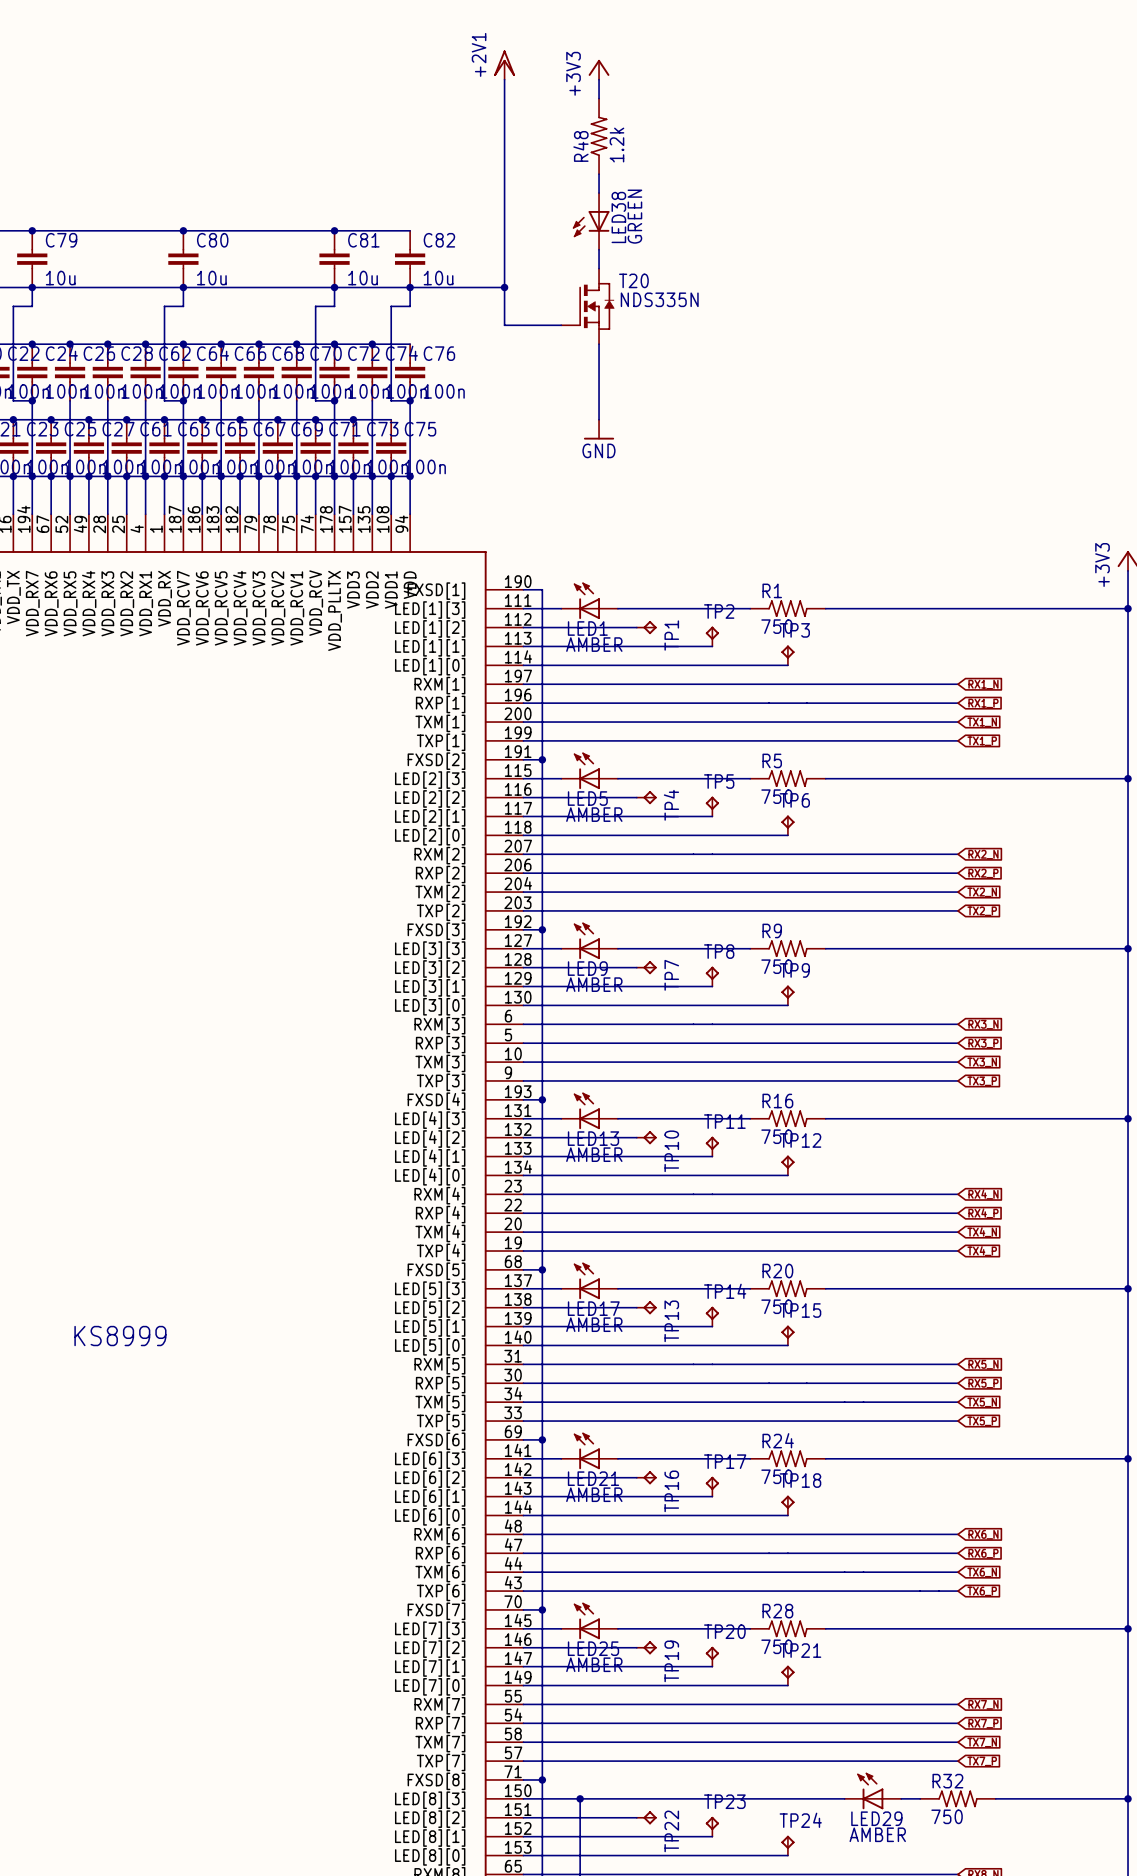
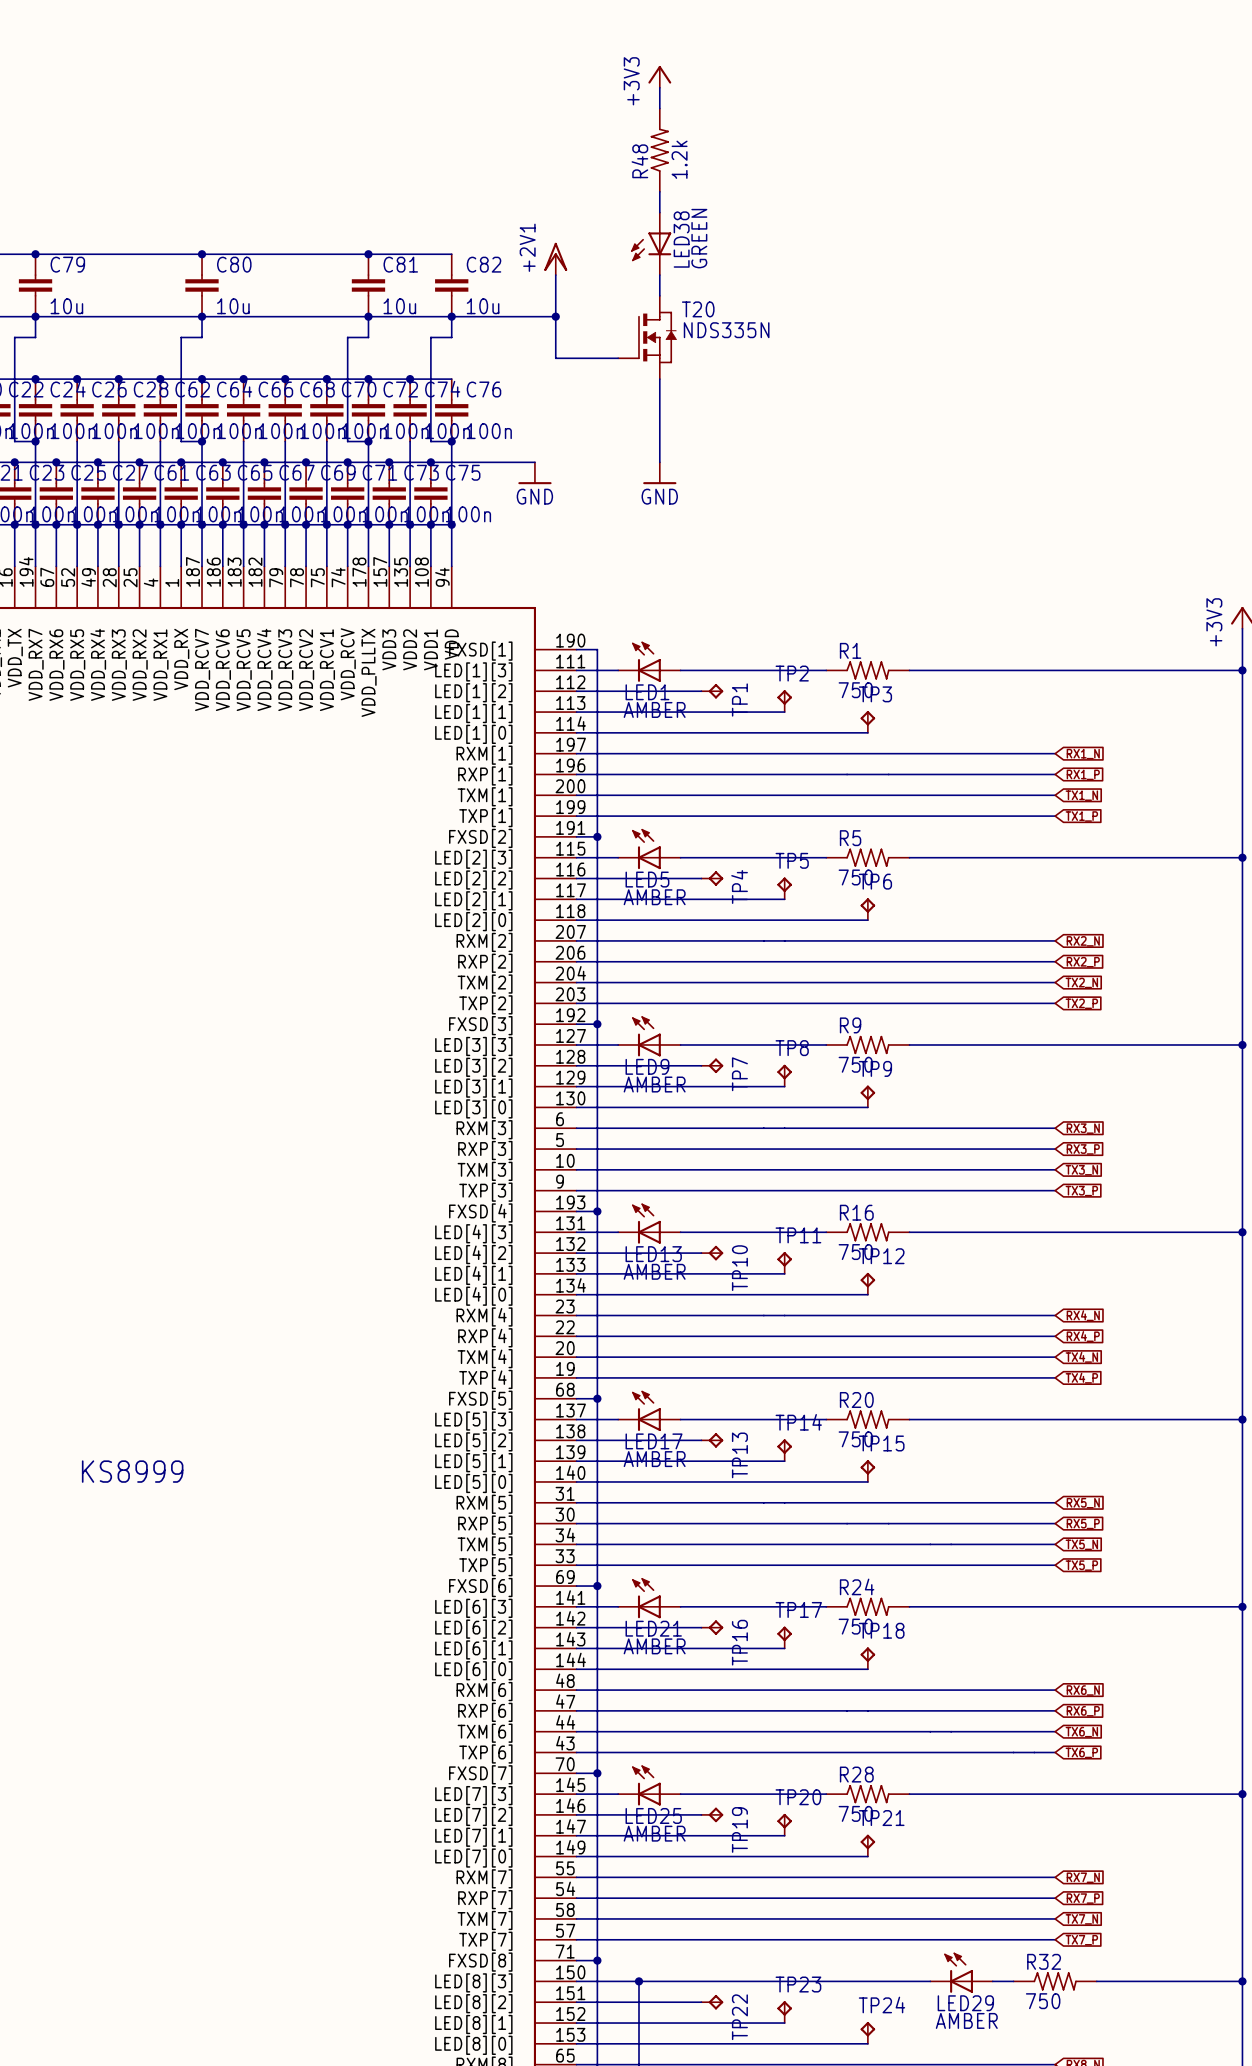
power symbol position: +2V1 (504, 65) -> +2V1 (555, 258)
wire: (504, 79) (504, 249) -> none
wire: none -> (430, 462) (534, 462)
junction: none -> (430, 462)
power symbol: none -> GND (534, 473)

